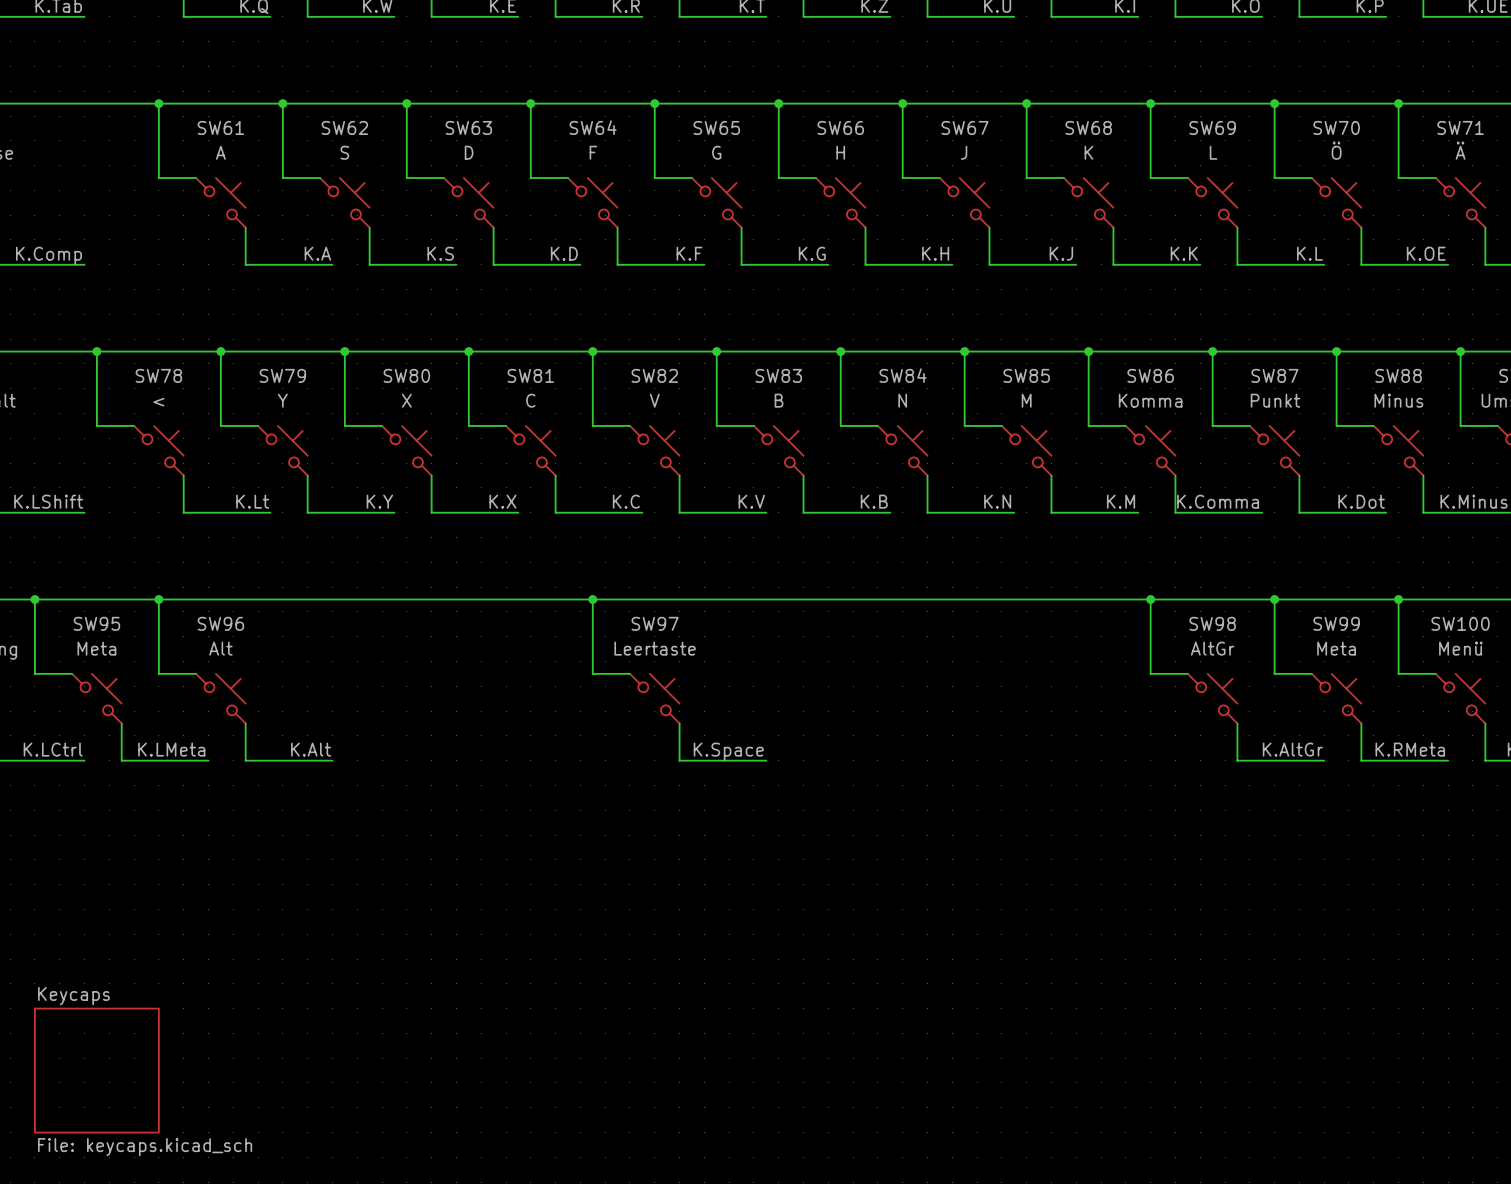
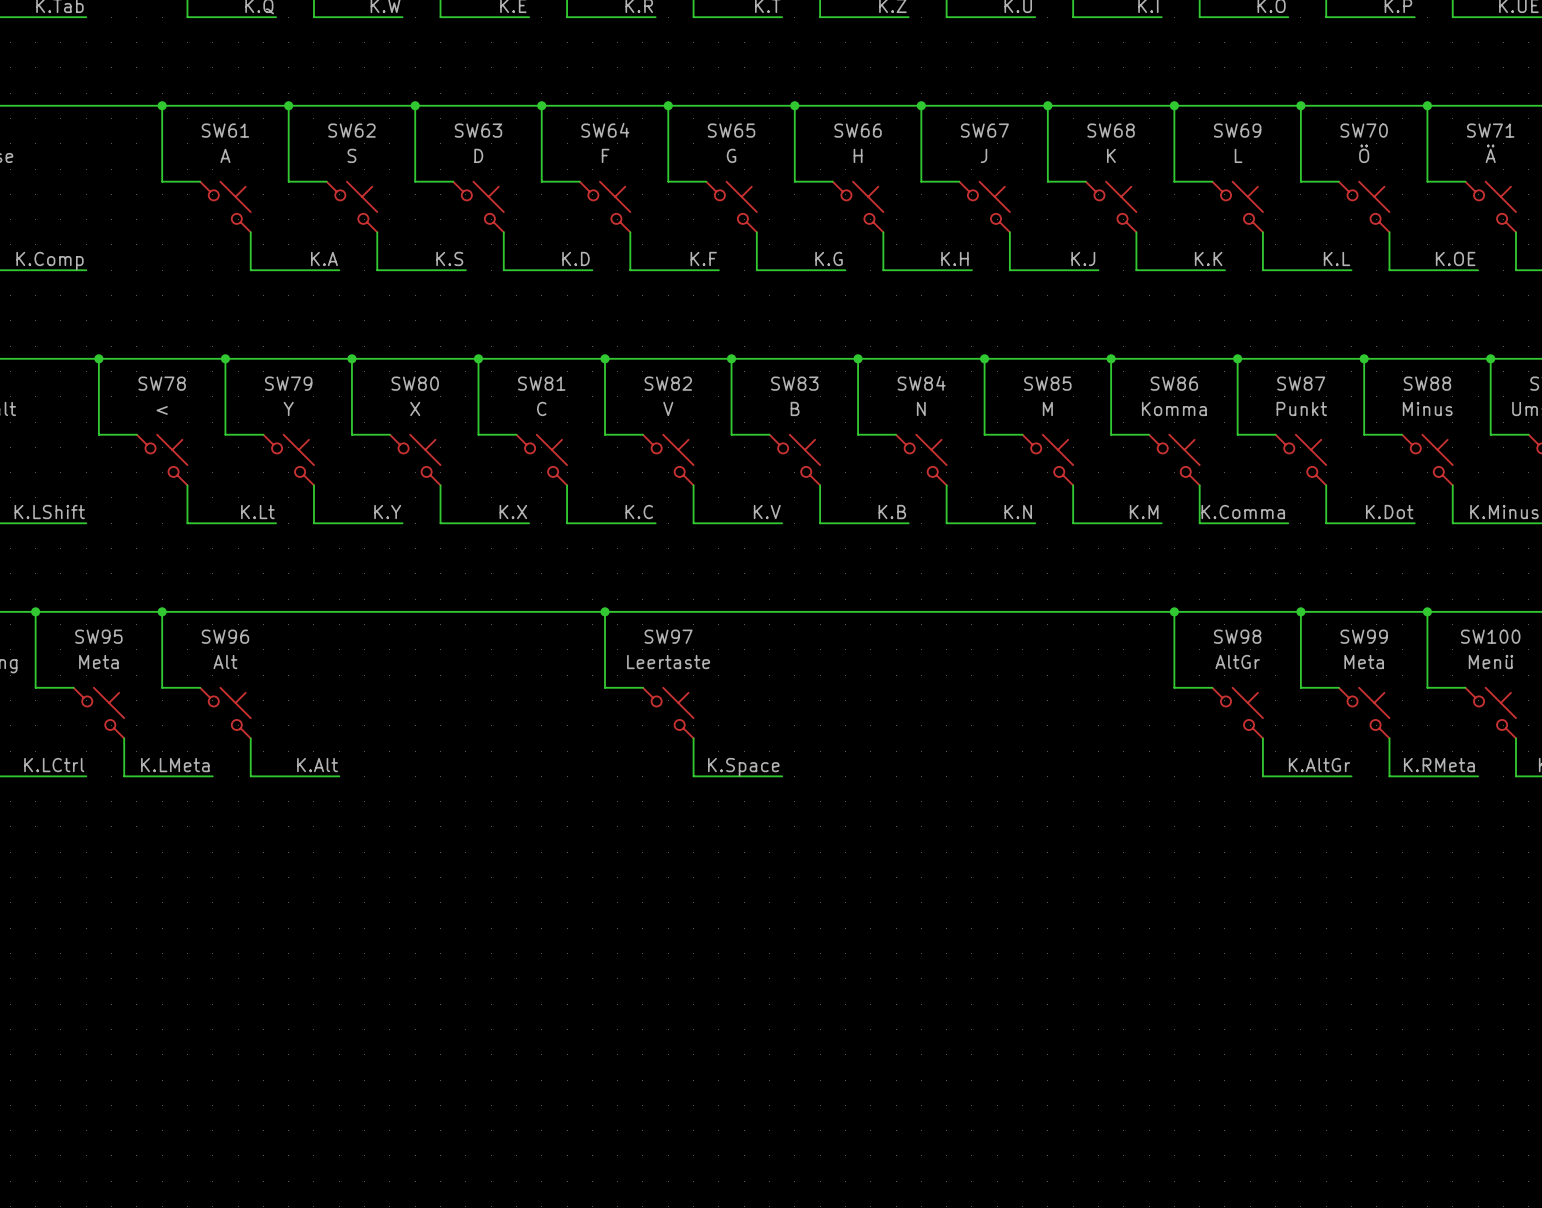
sheet Keycaps: File: keycaps.kicad_sch (96, 1070) -> none

